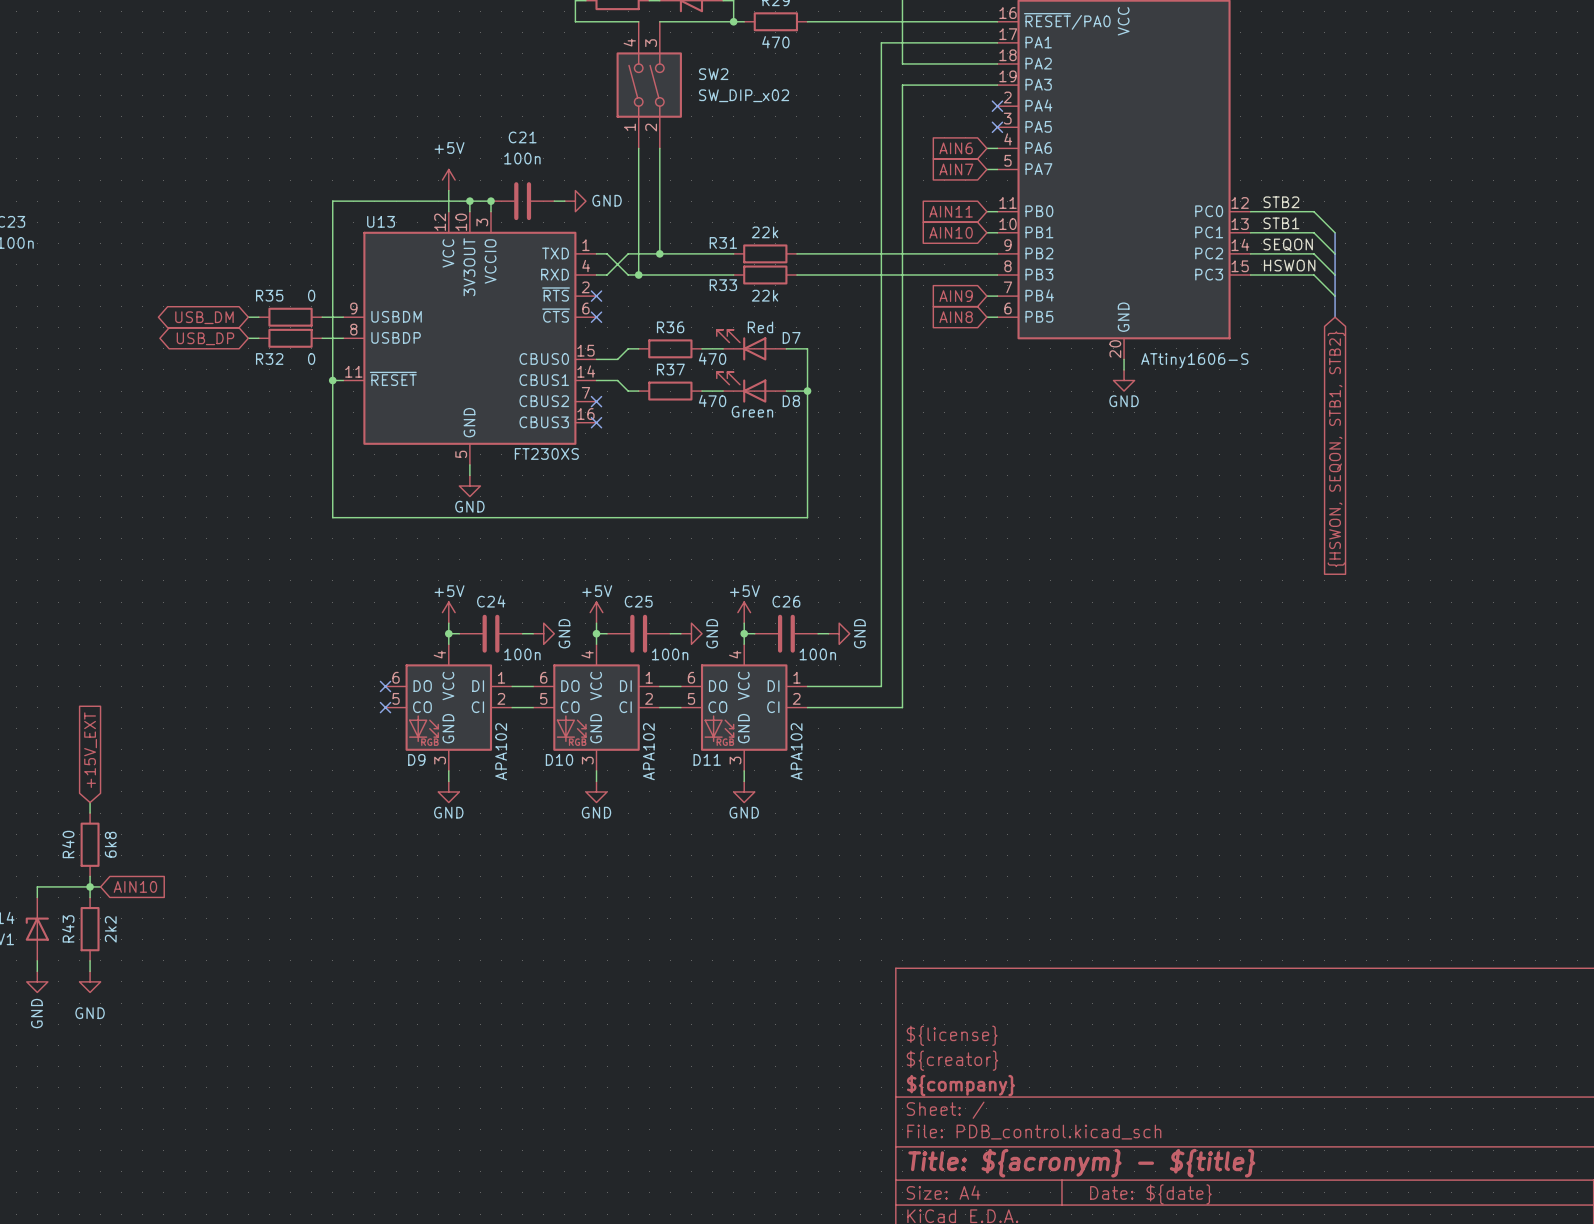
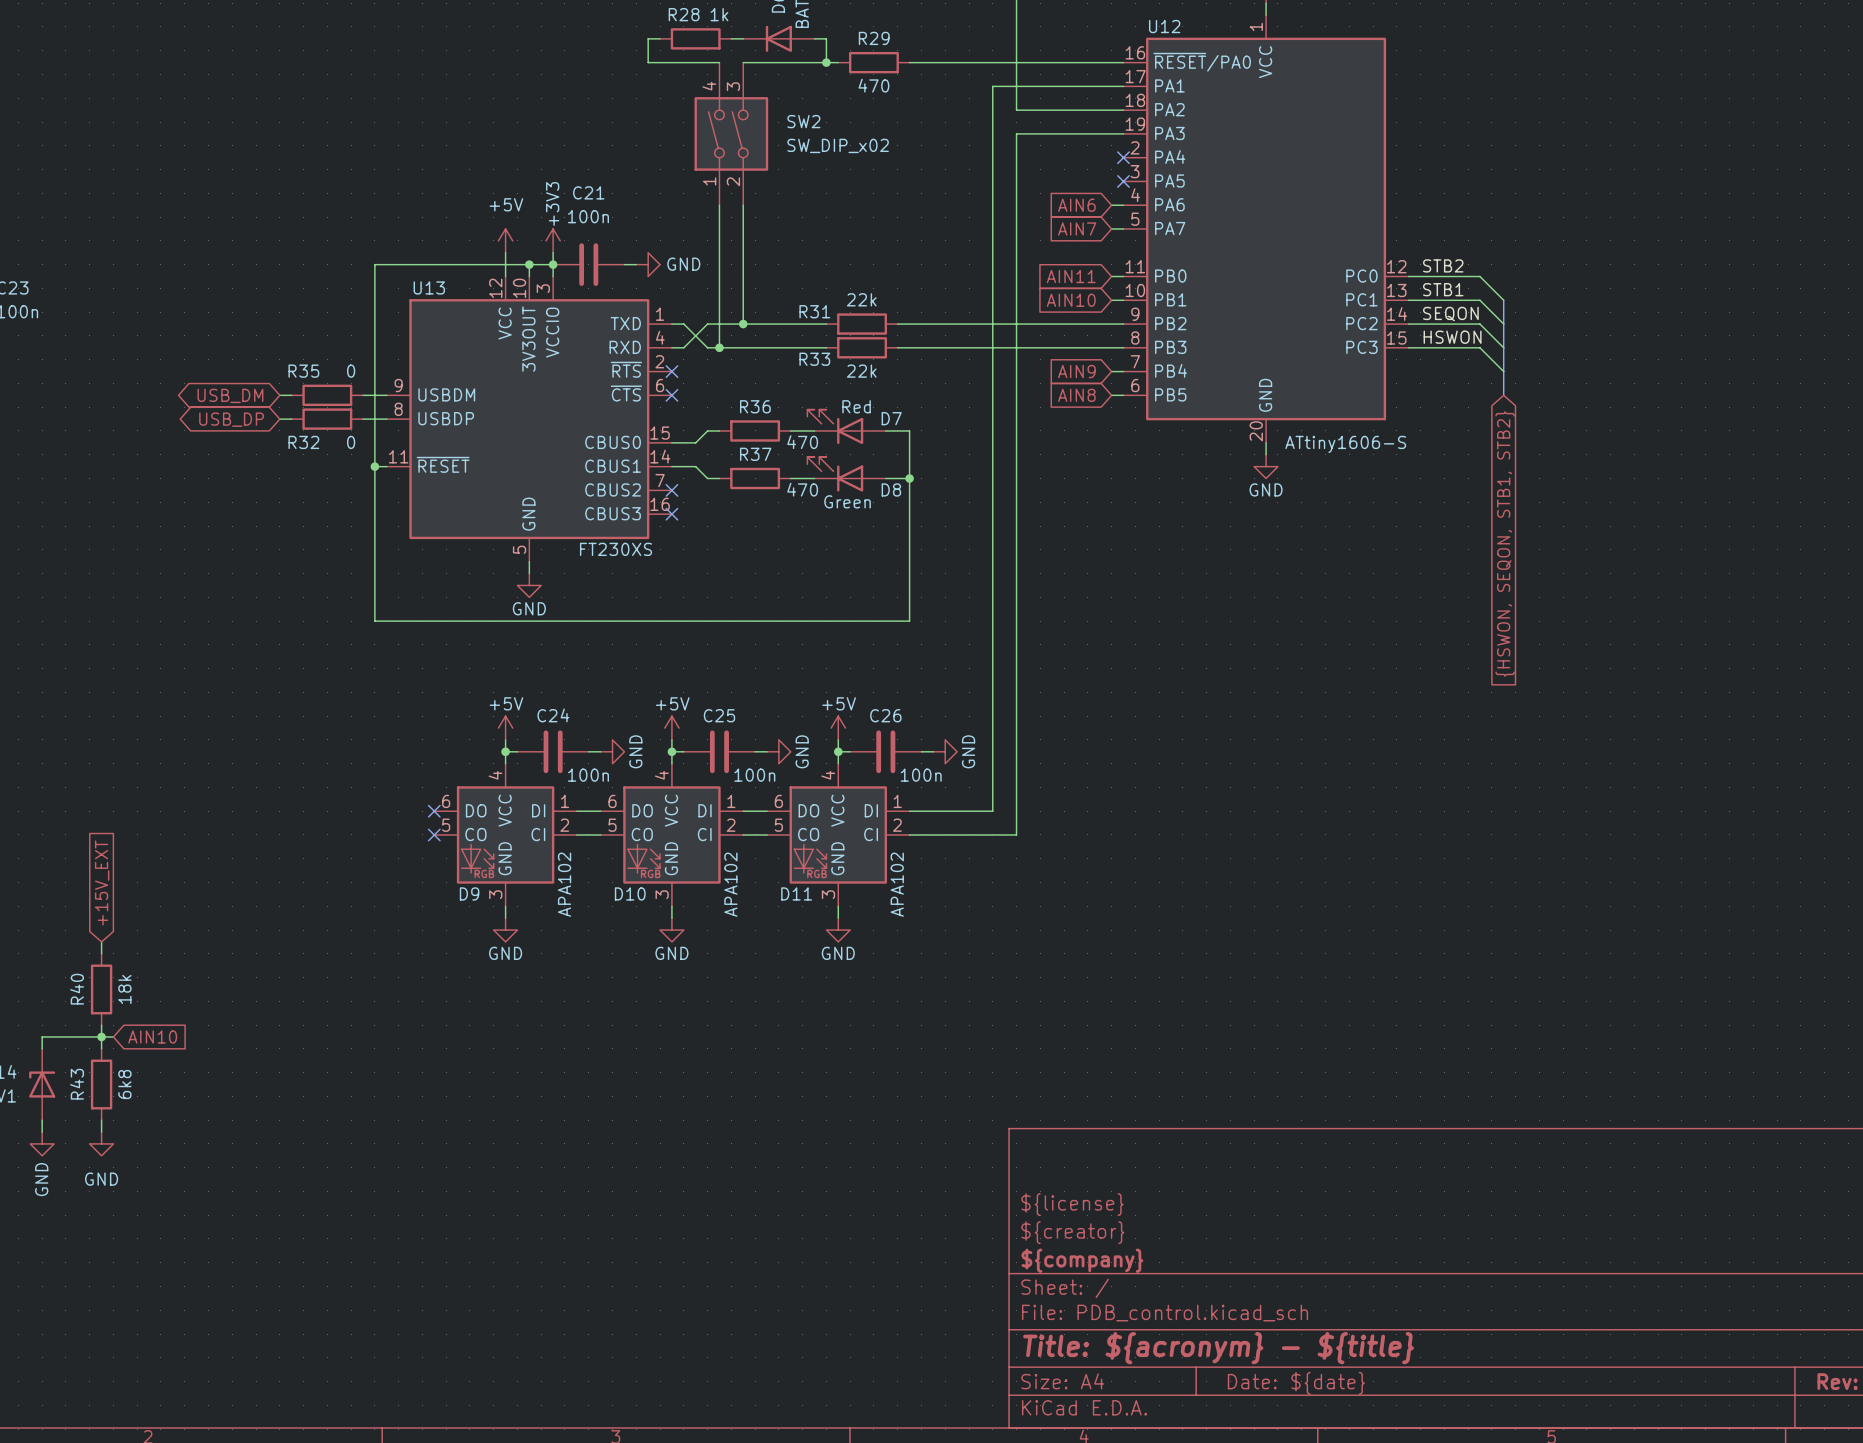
power symbol: none -> +3V3 (553, 240)
wire: none -> (553, 252) (553, 264)
R40 value: 6k8 (110, 844) -> 18k (124, 989)
R43 value: 2k2 (110, 929) -> 6k8 (124, 1084)

